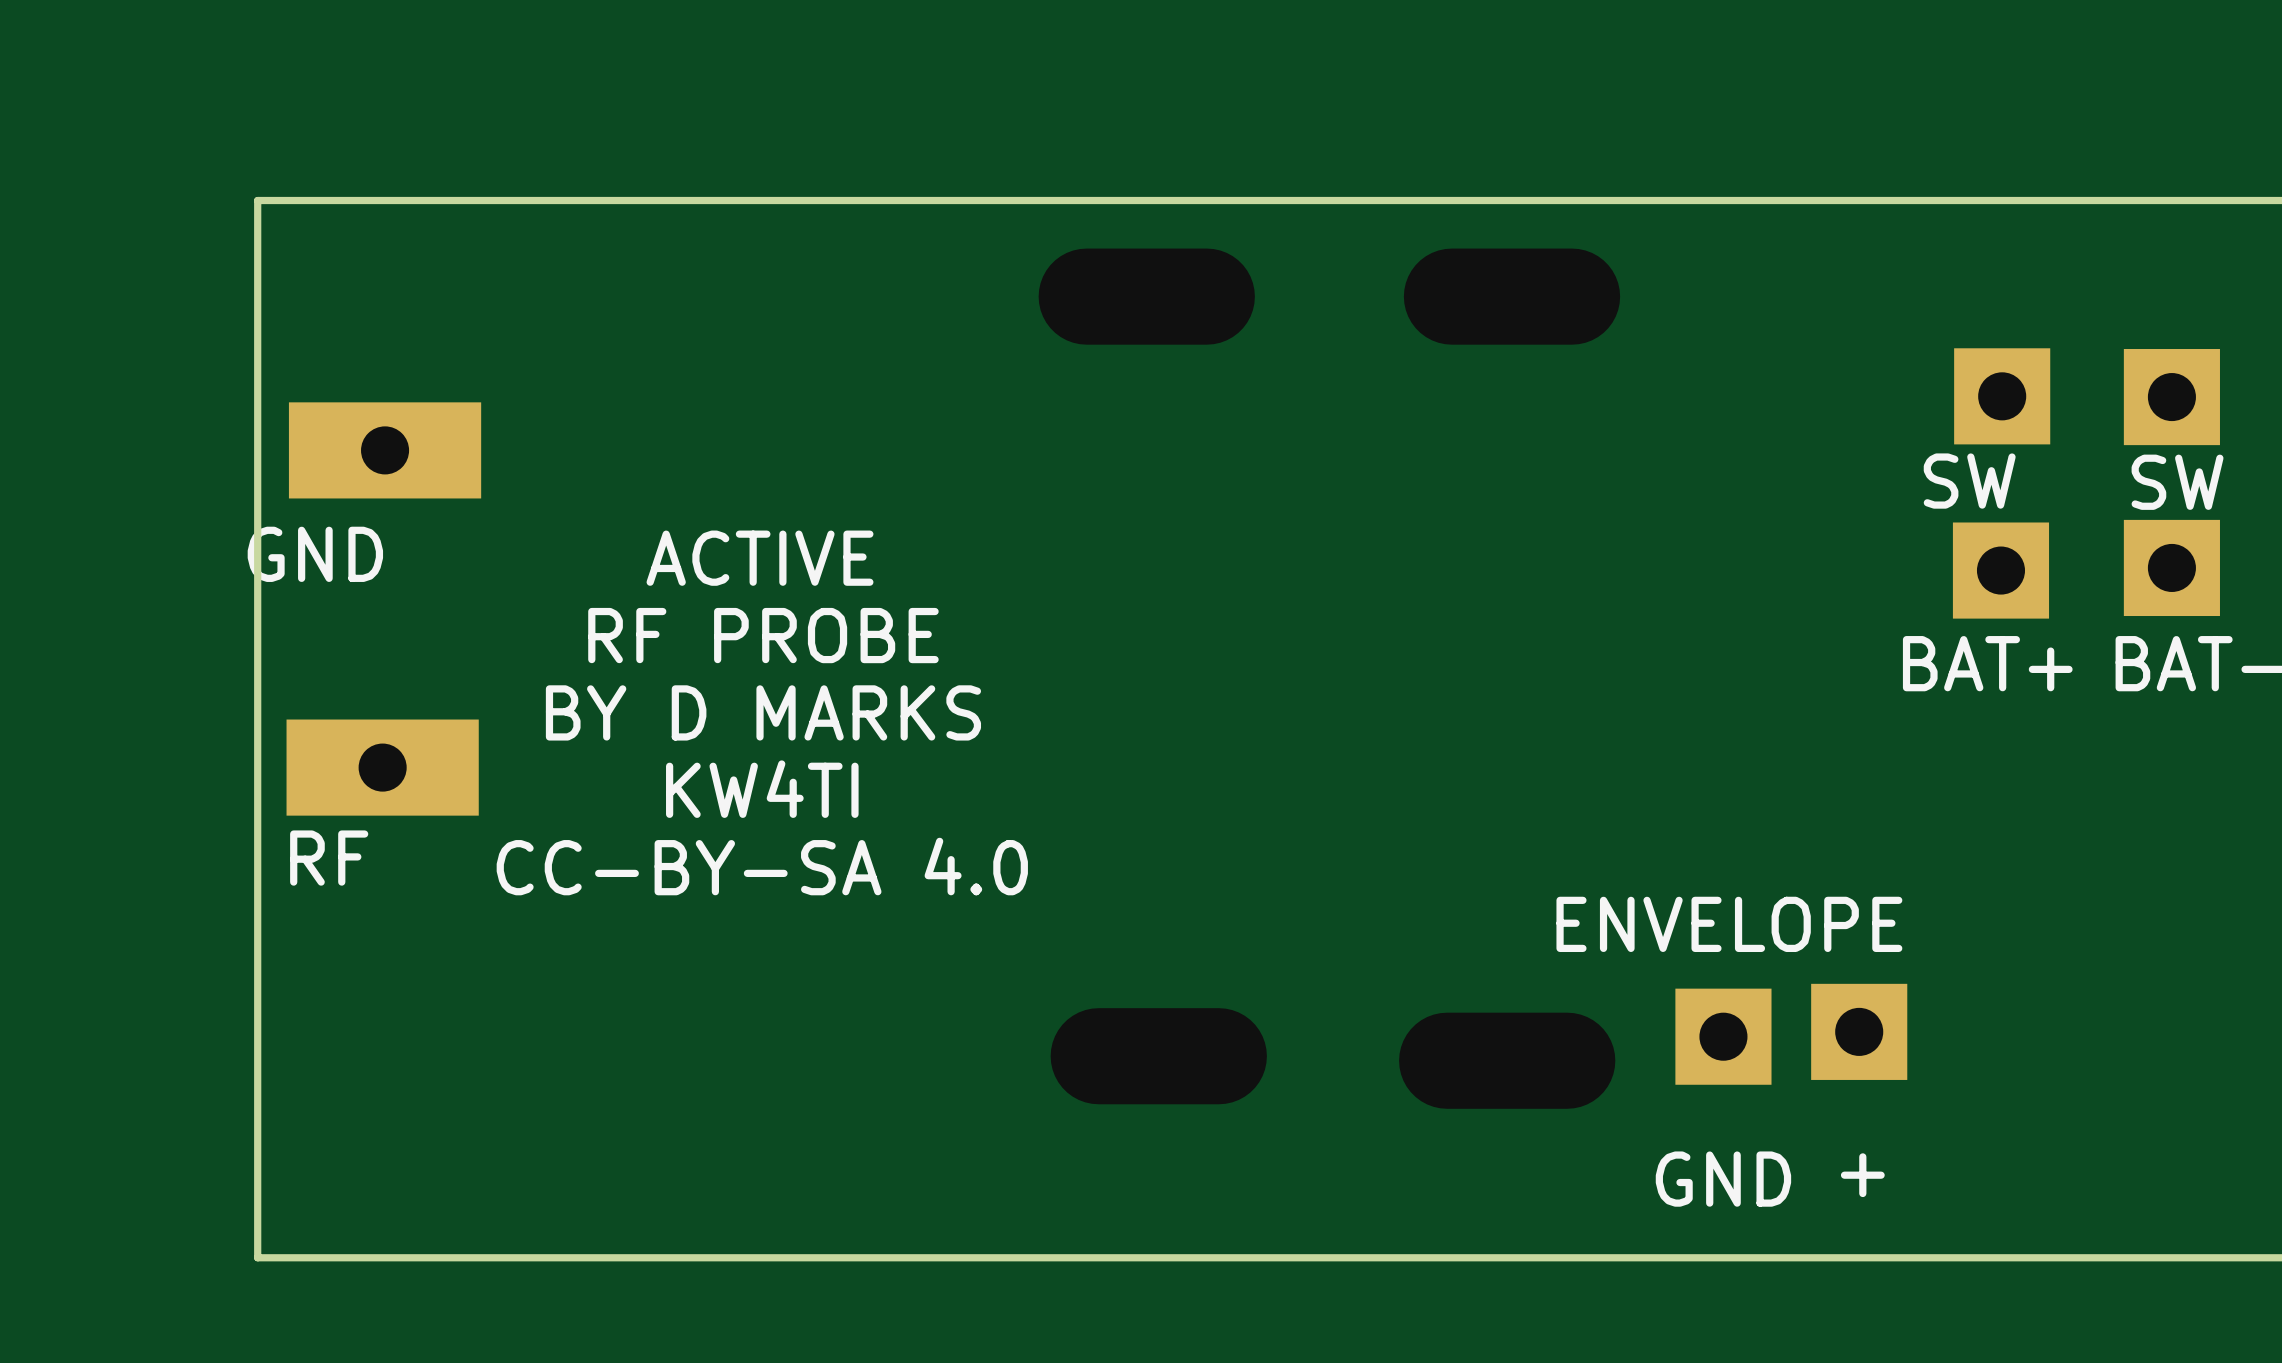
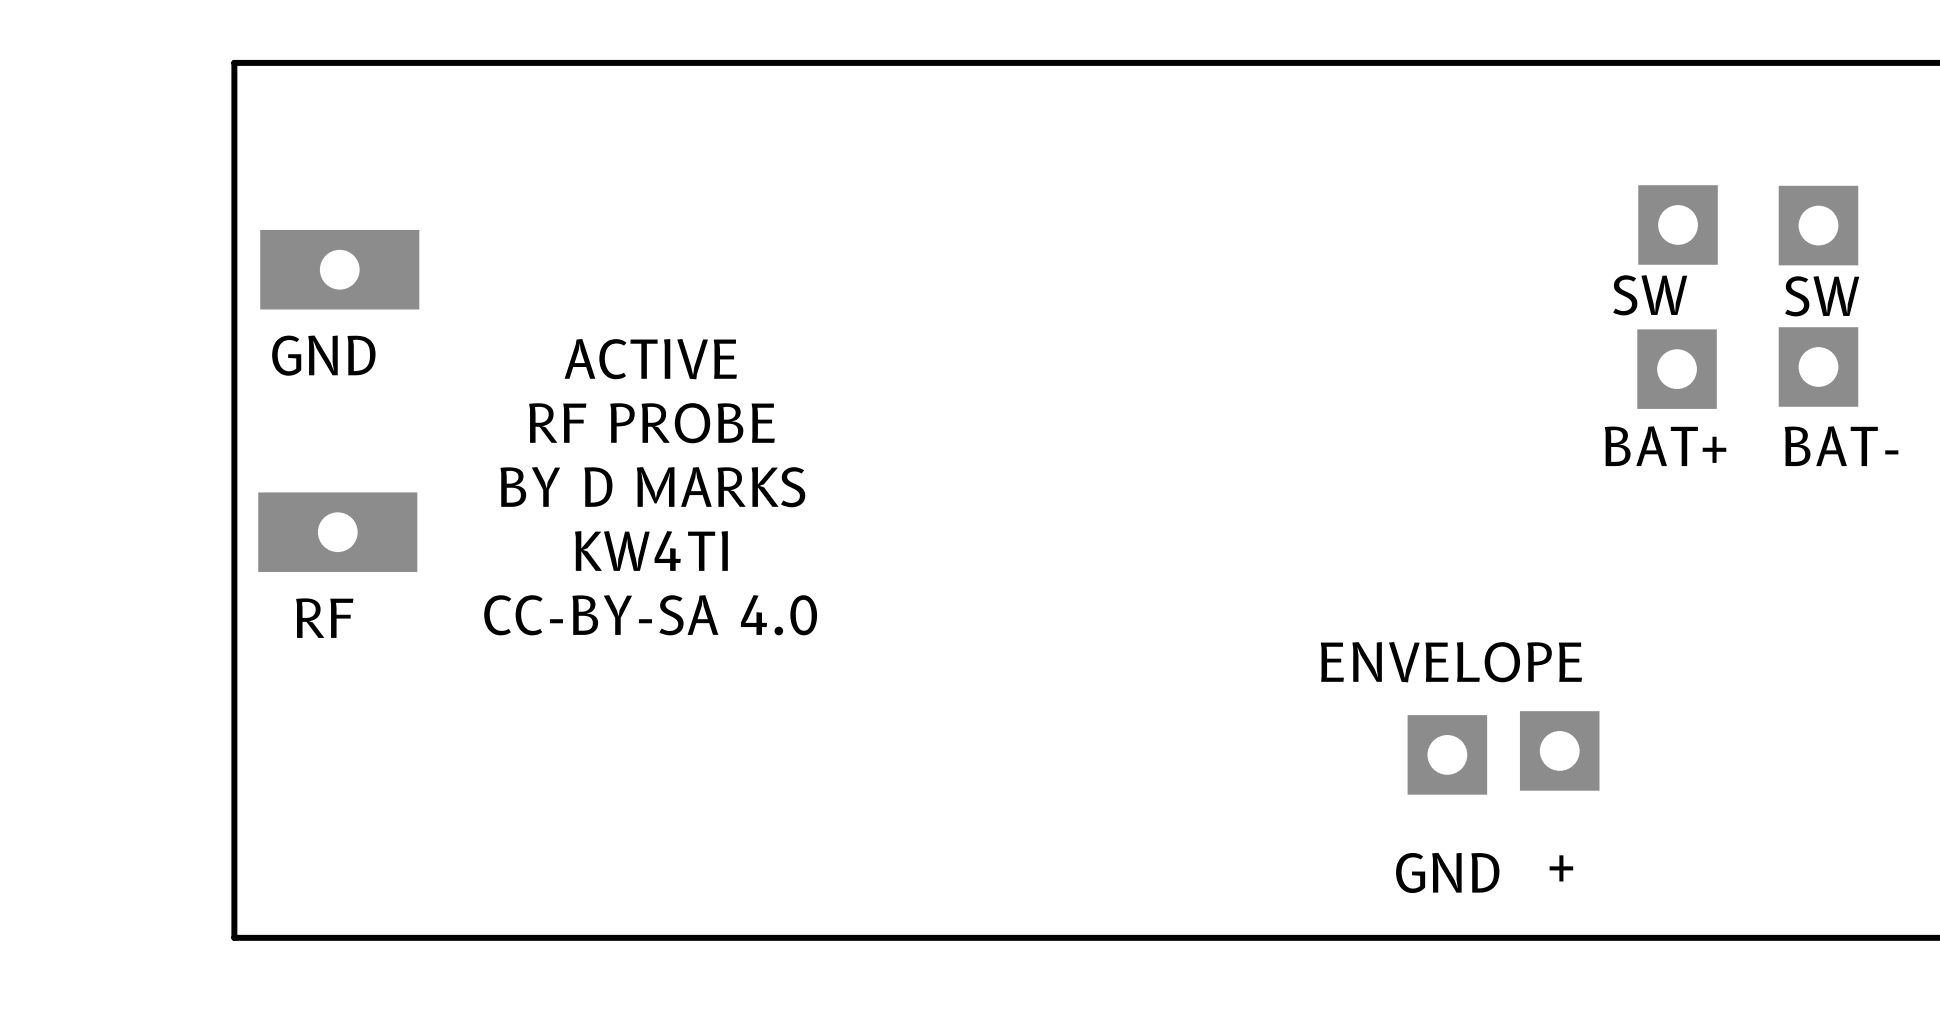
text position: GND (315, 554) -> GND (323, 355)
text position: RF (329, 858) -> RF (324, 618)

